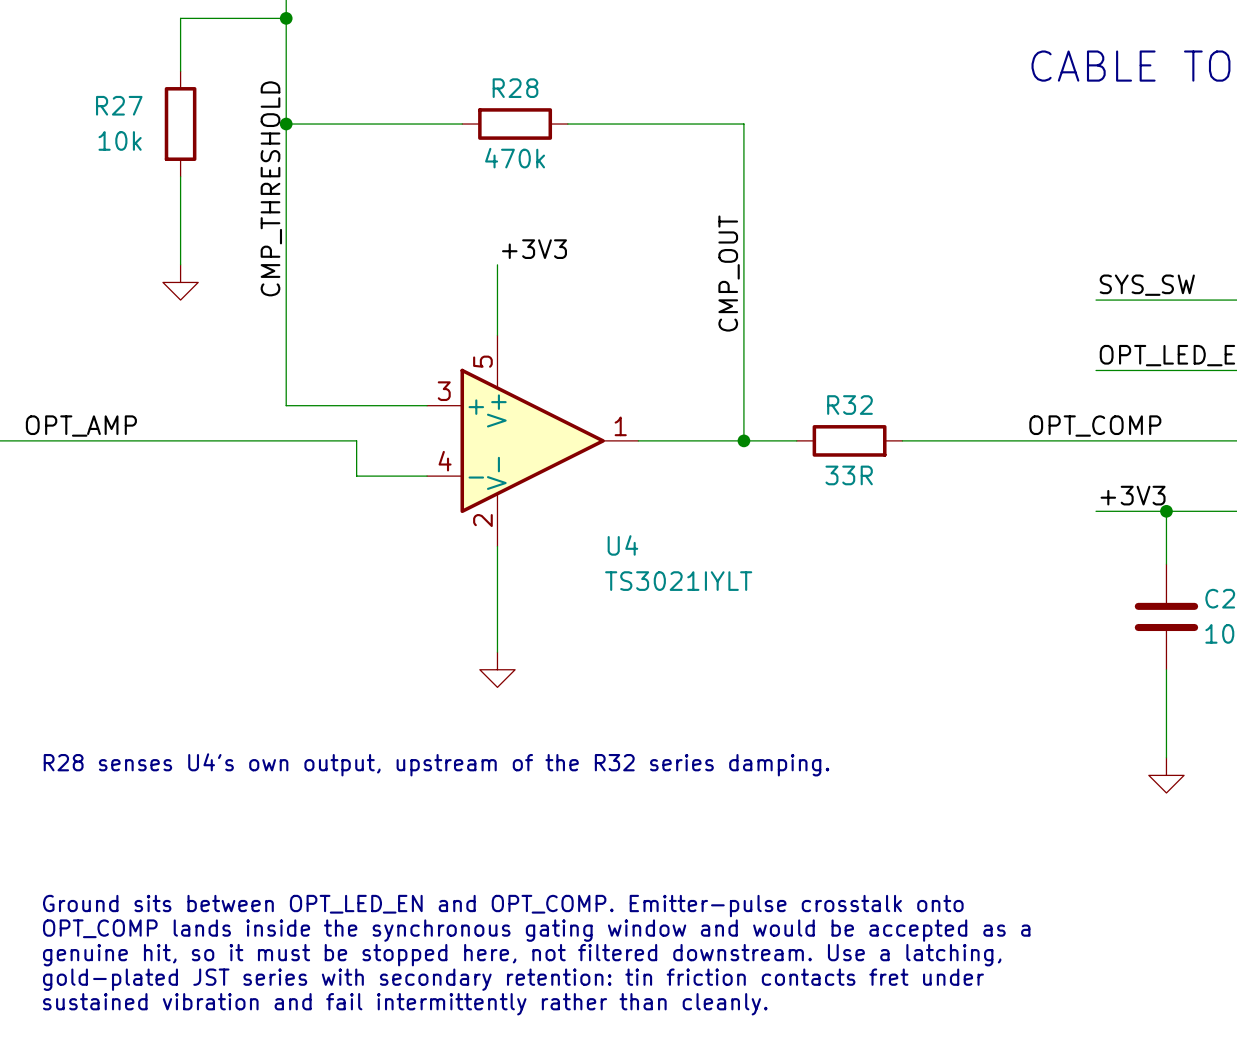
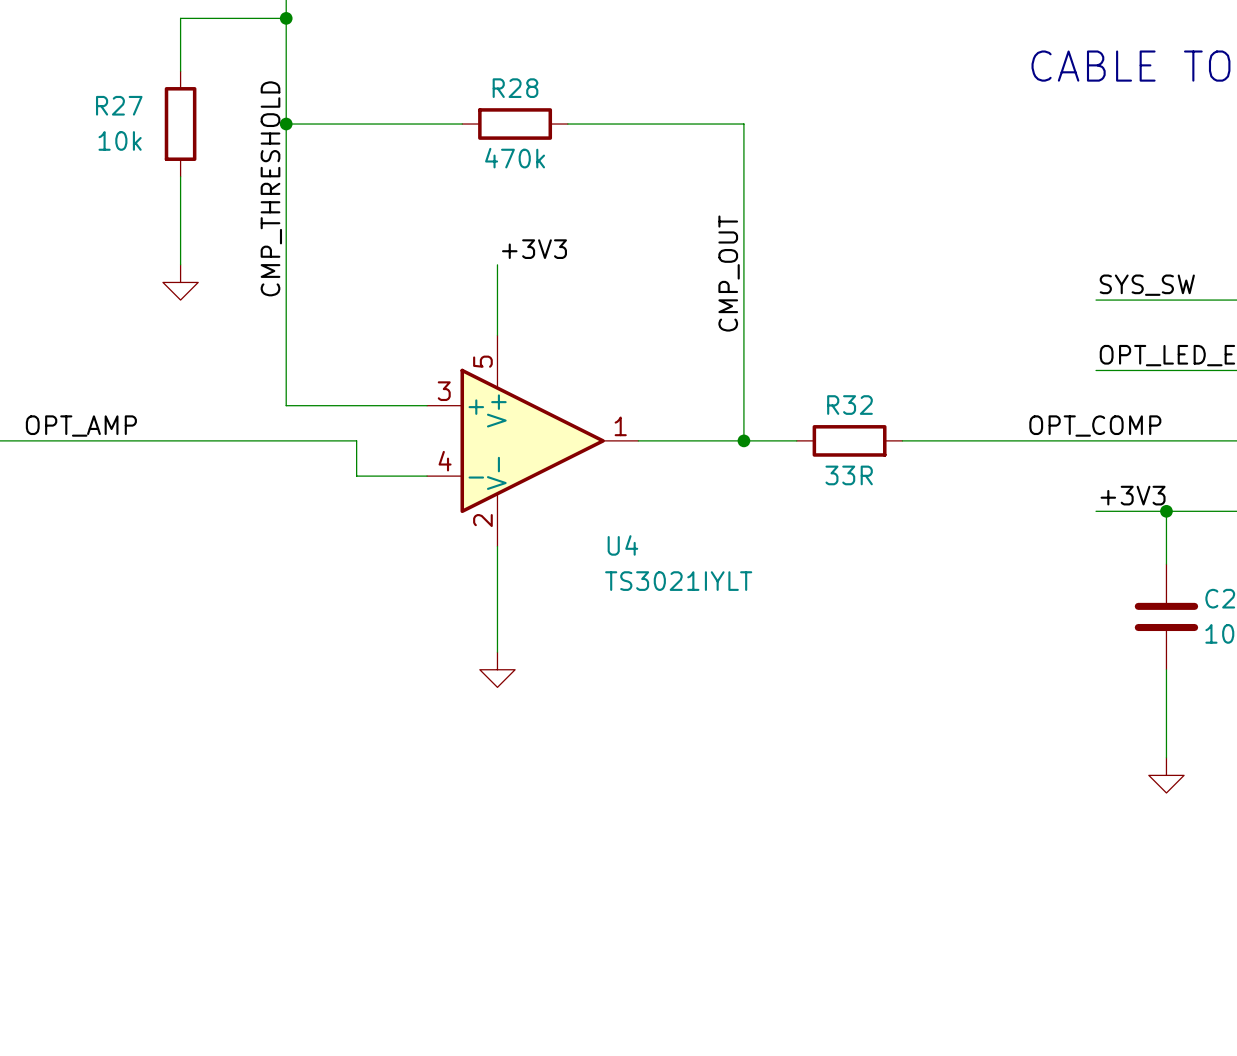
text: R28 senses U4's own output, upstream of the R32 series damping. (436, 764) -> none
text: Ground sits between OPT_LED_EN and OPT_COMP. Emitter-pulse crosstalk onto (503, 906) -> none
text: OPT_COMP lands inside the synchronous gating window and would be accepted as a (536, 930) -> none
text: genuine hit, so it must be stopped here, not filtered downstream. Use a latching, (522, 955) -> none
text: gold-plated JST series with secondary retention: tin friction contacts fret under (513, 979) -> none
text: sustained vibration and fail intermittently rather than cleanly. (405, 1004) -> none

